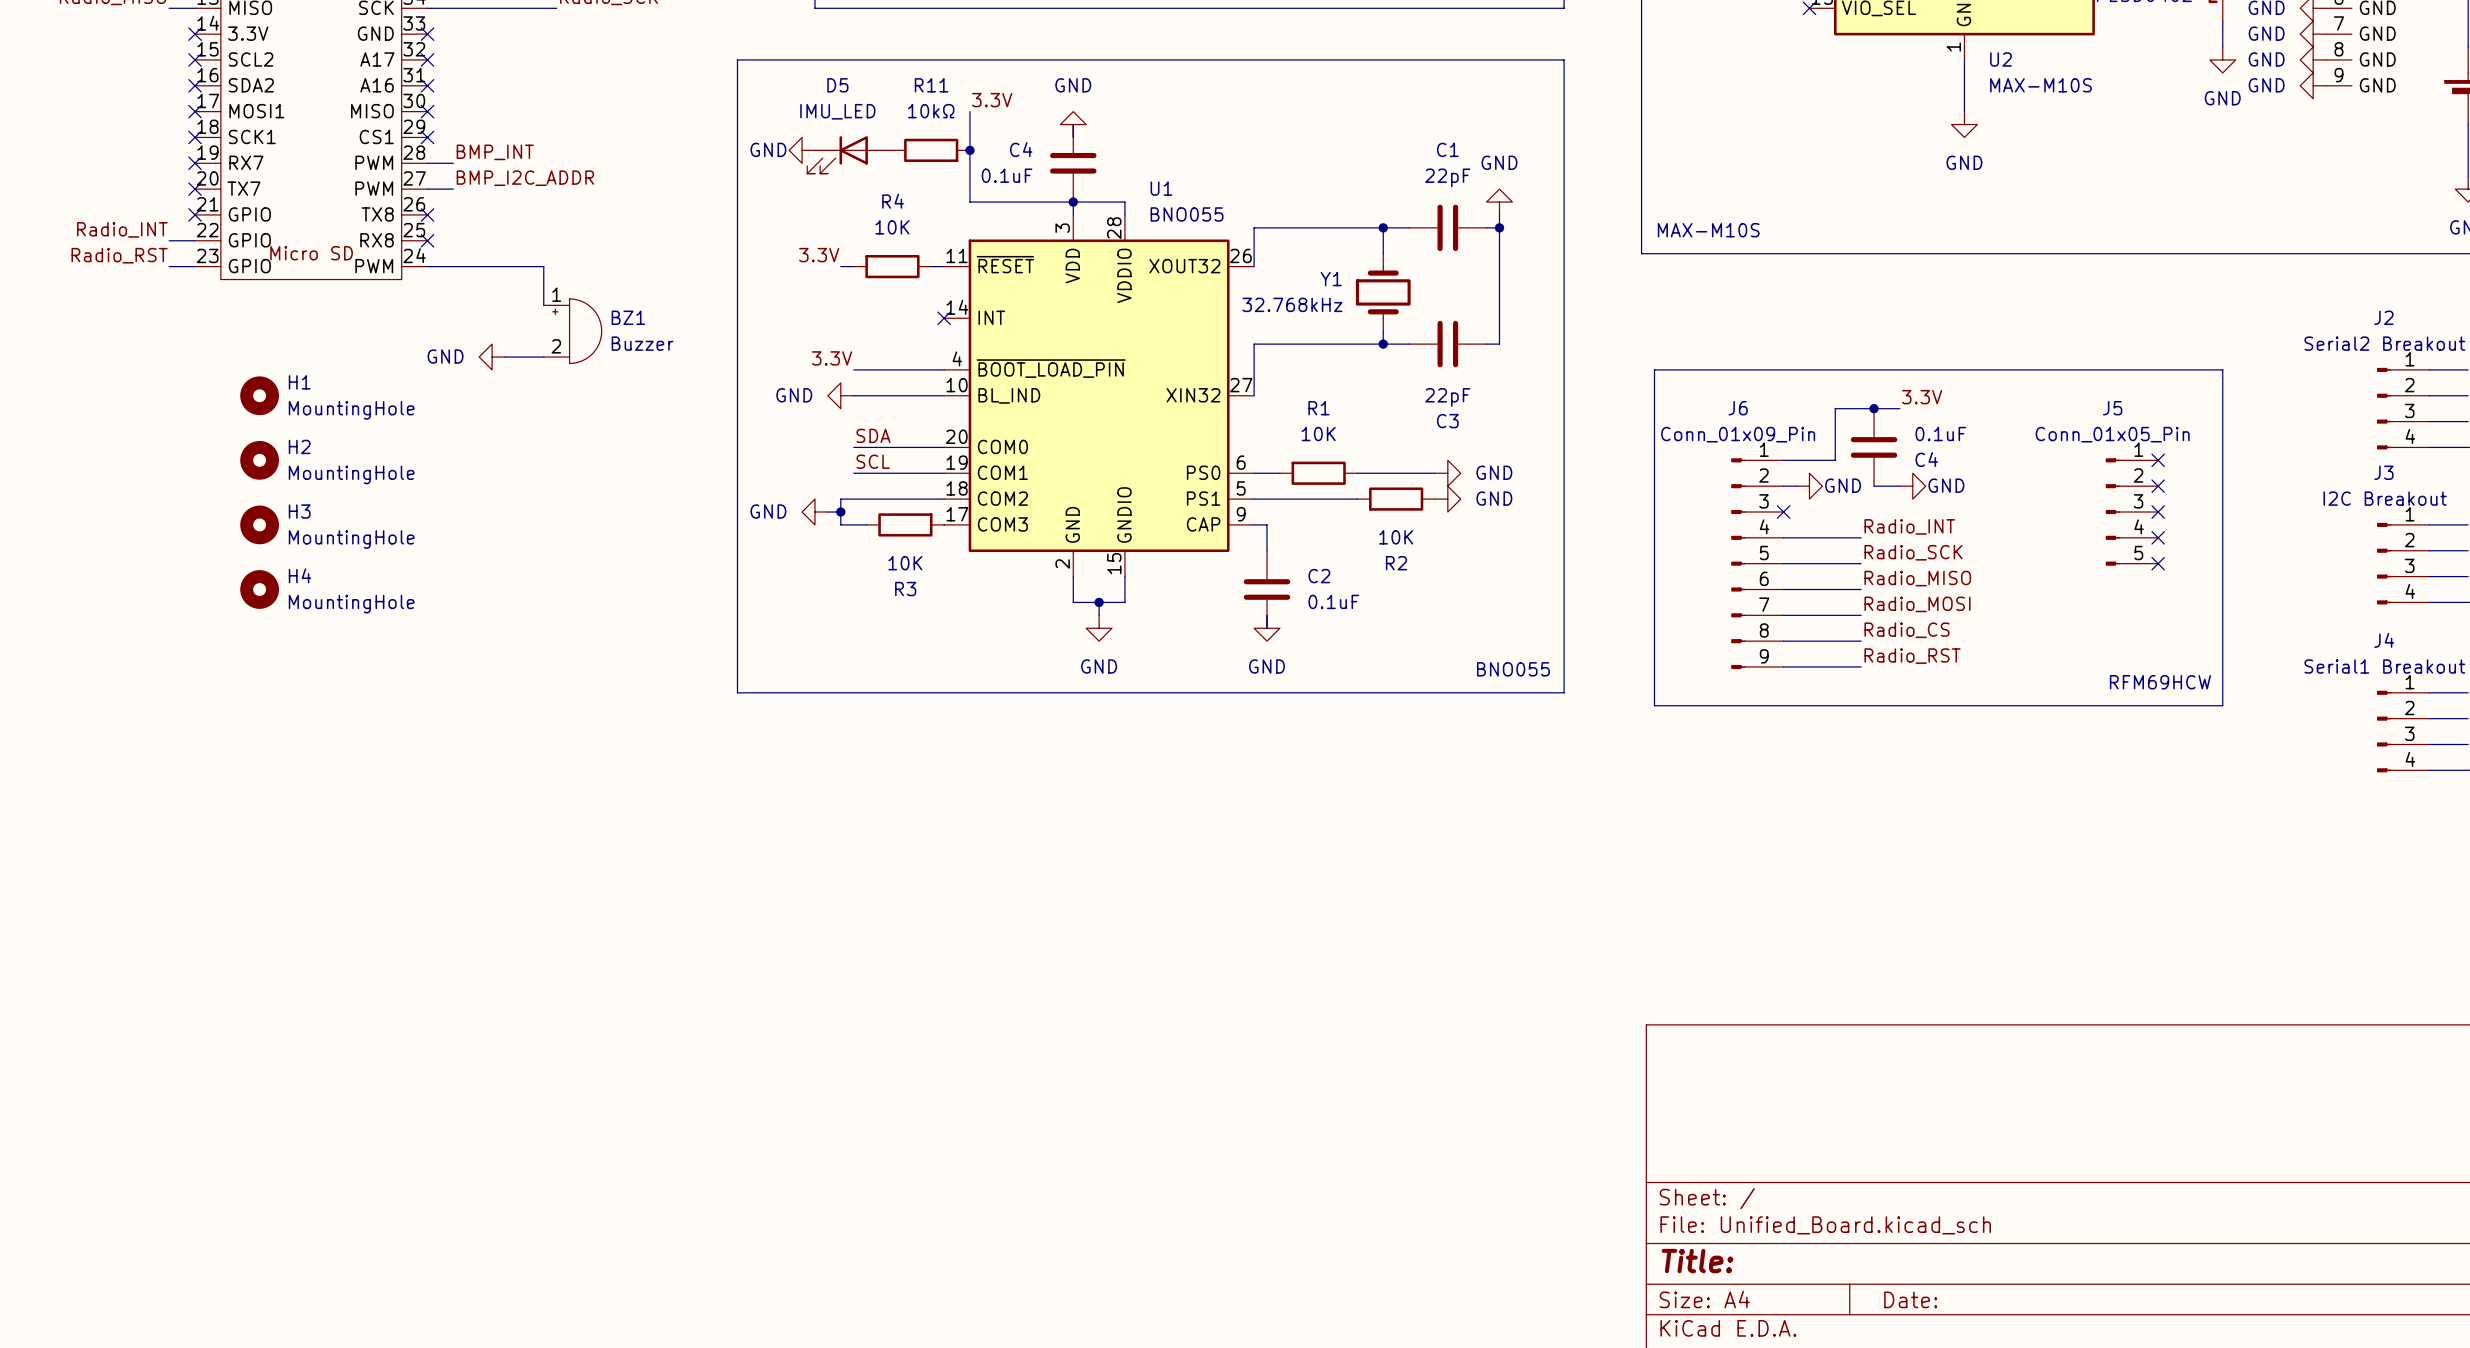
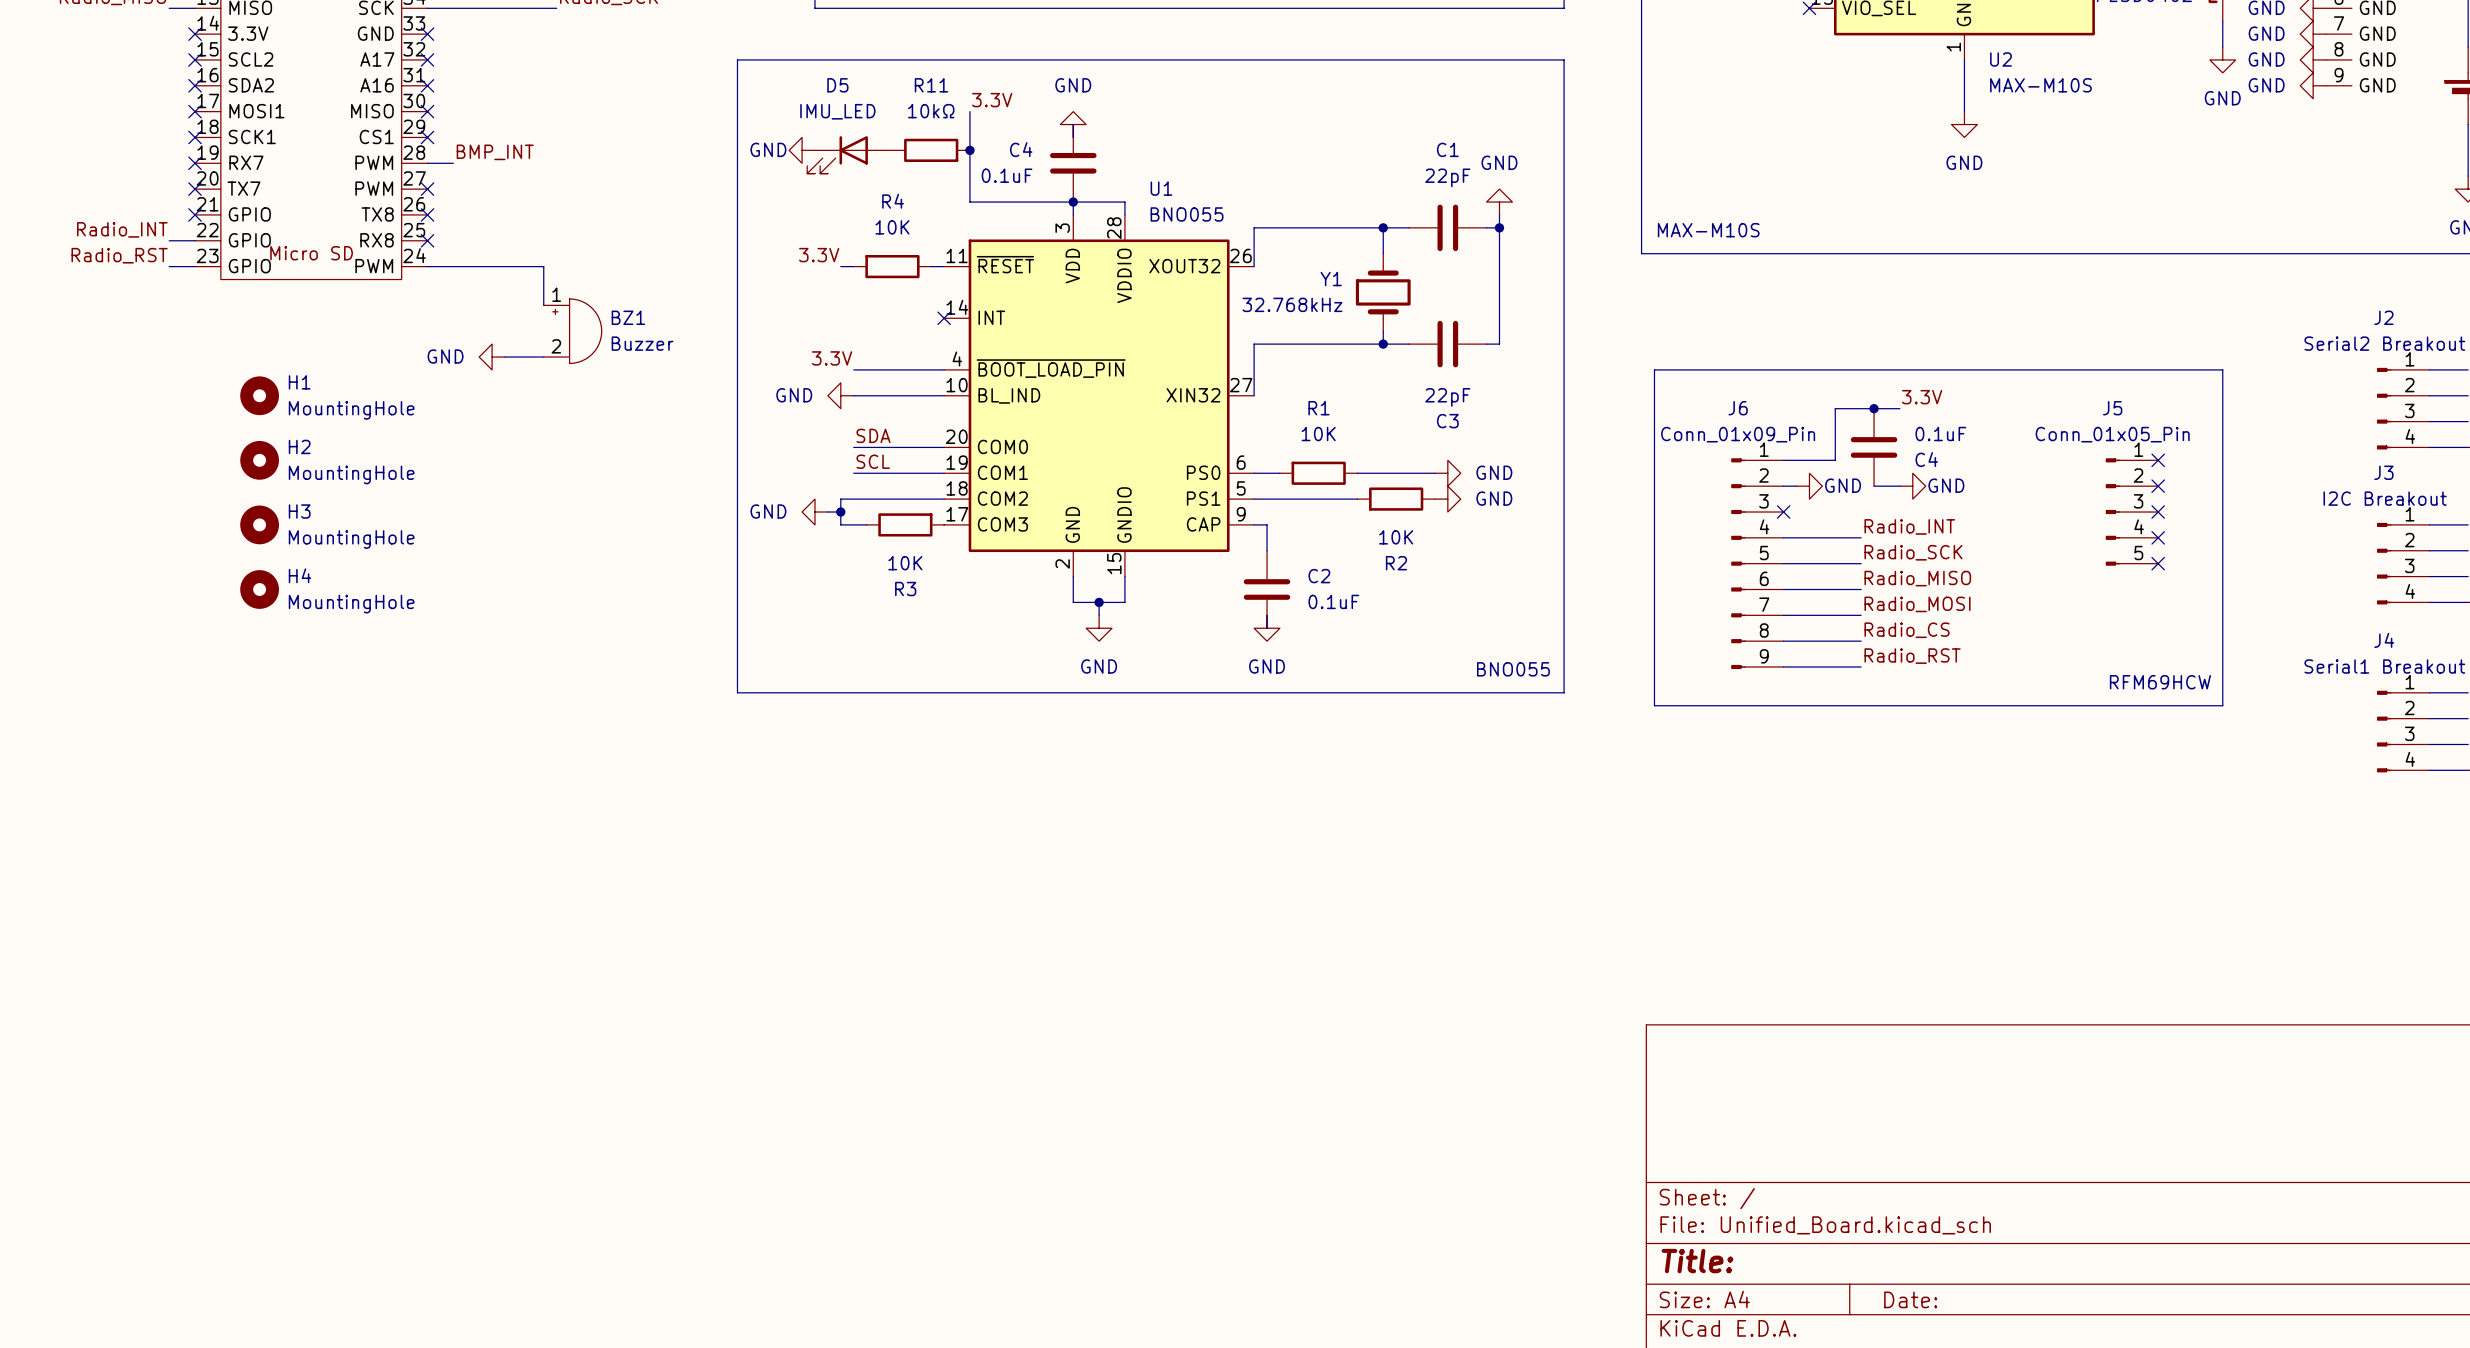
label: BMP_I2C_ADDR (525, 178) -> none
wire: (427, 189) (453, 189) -> none
no-connect mark: none -> (427, 189)

